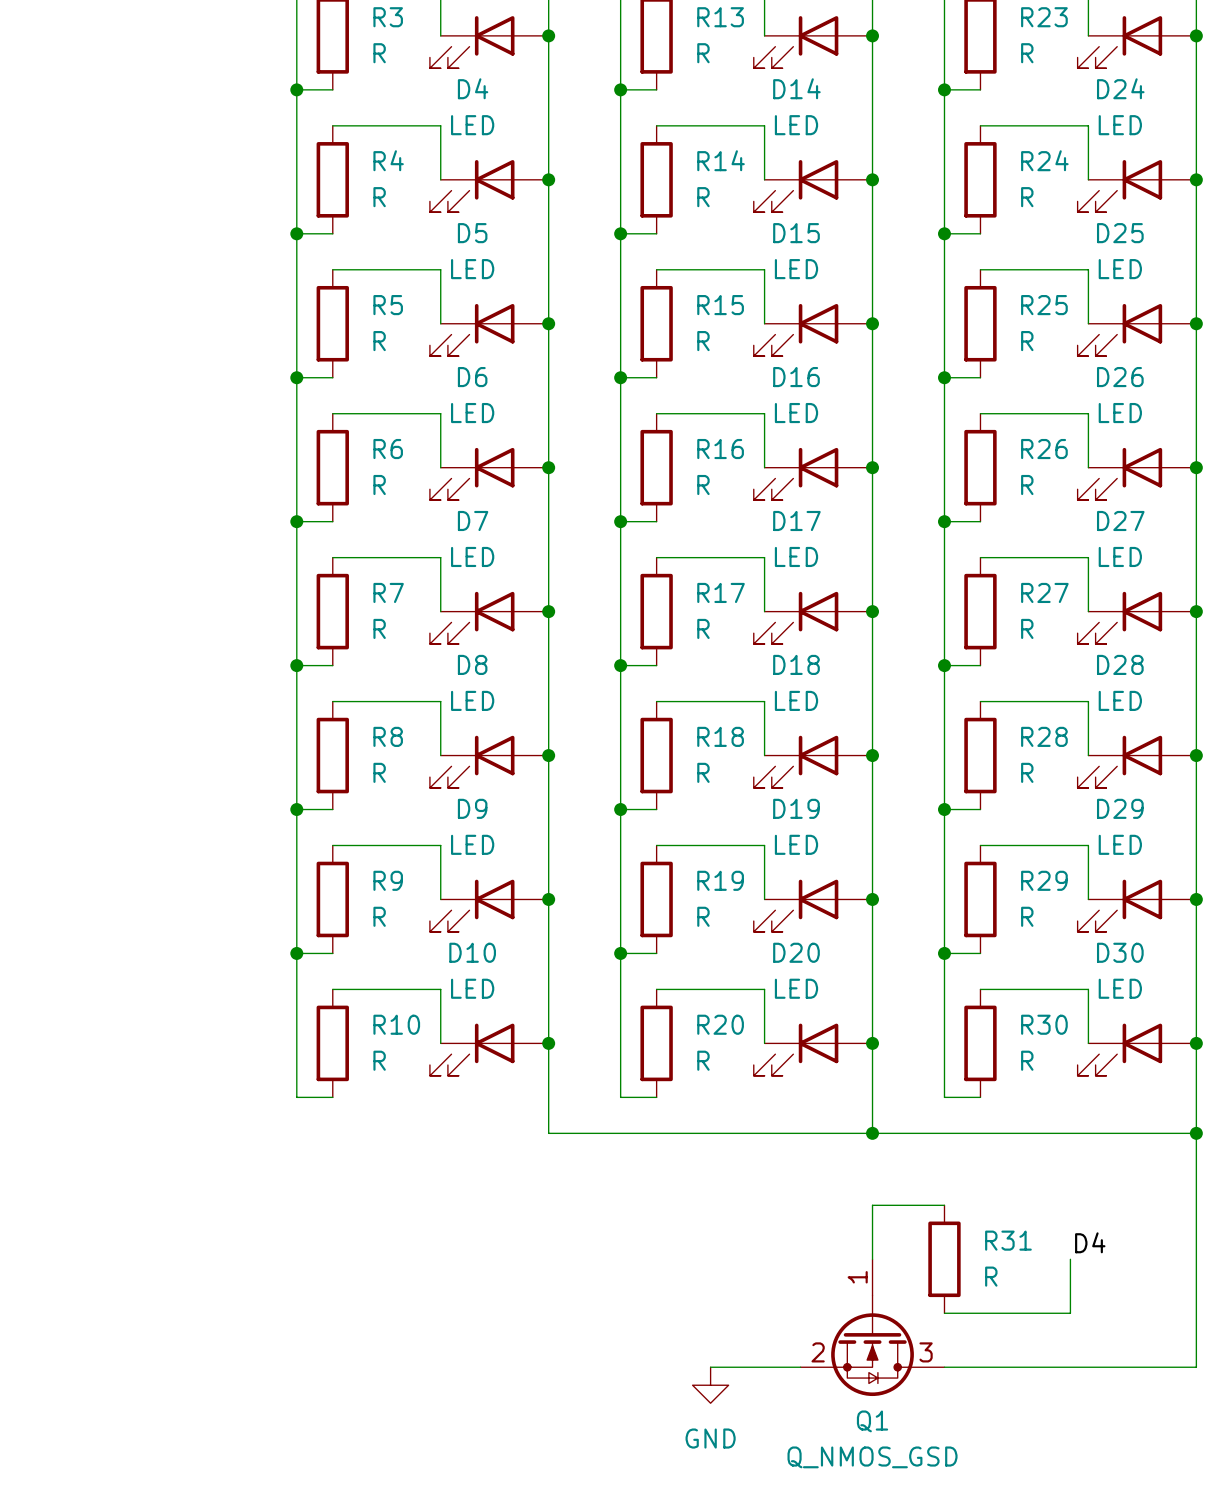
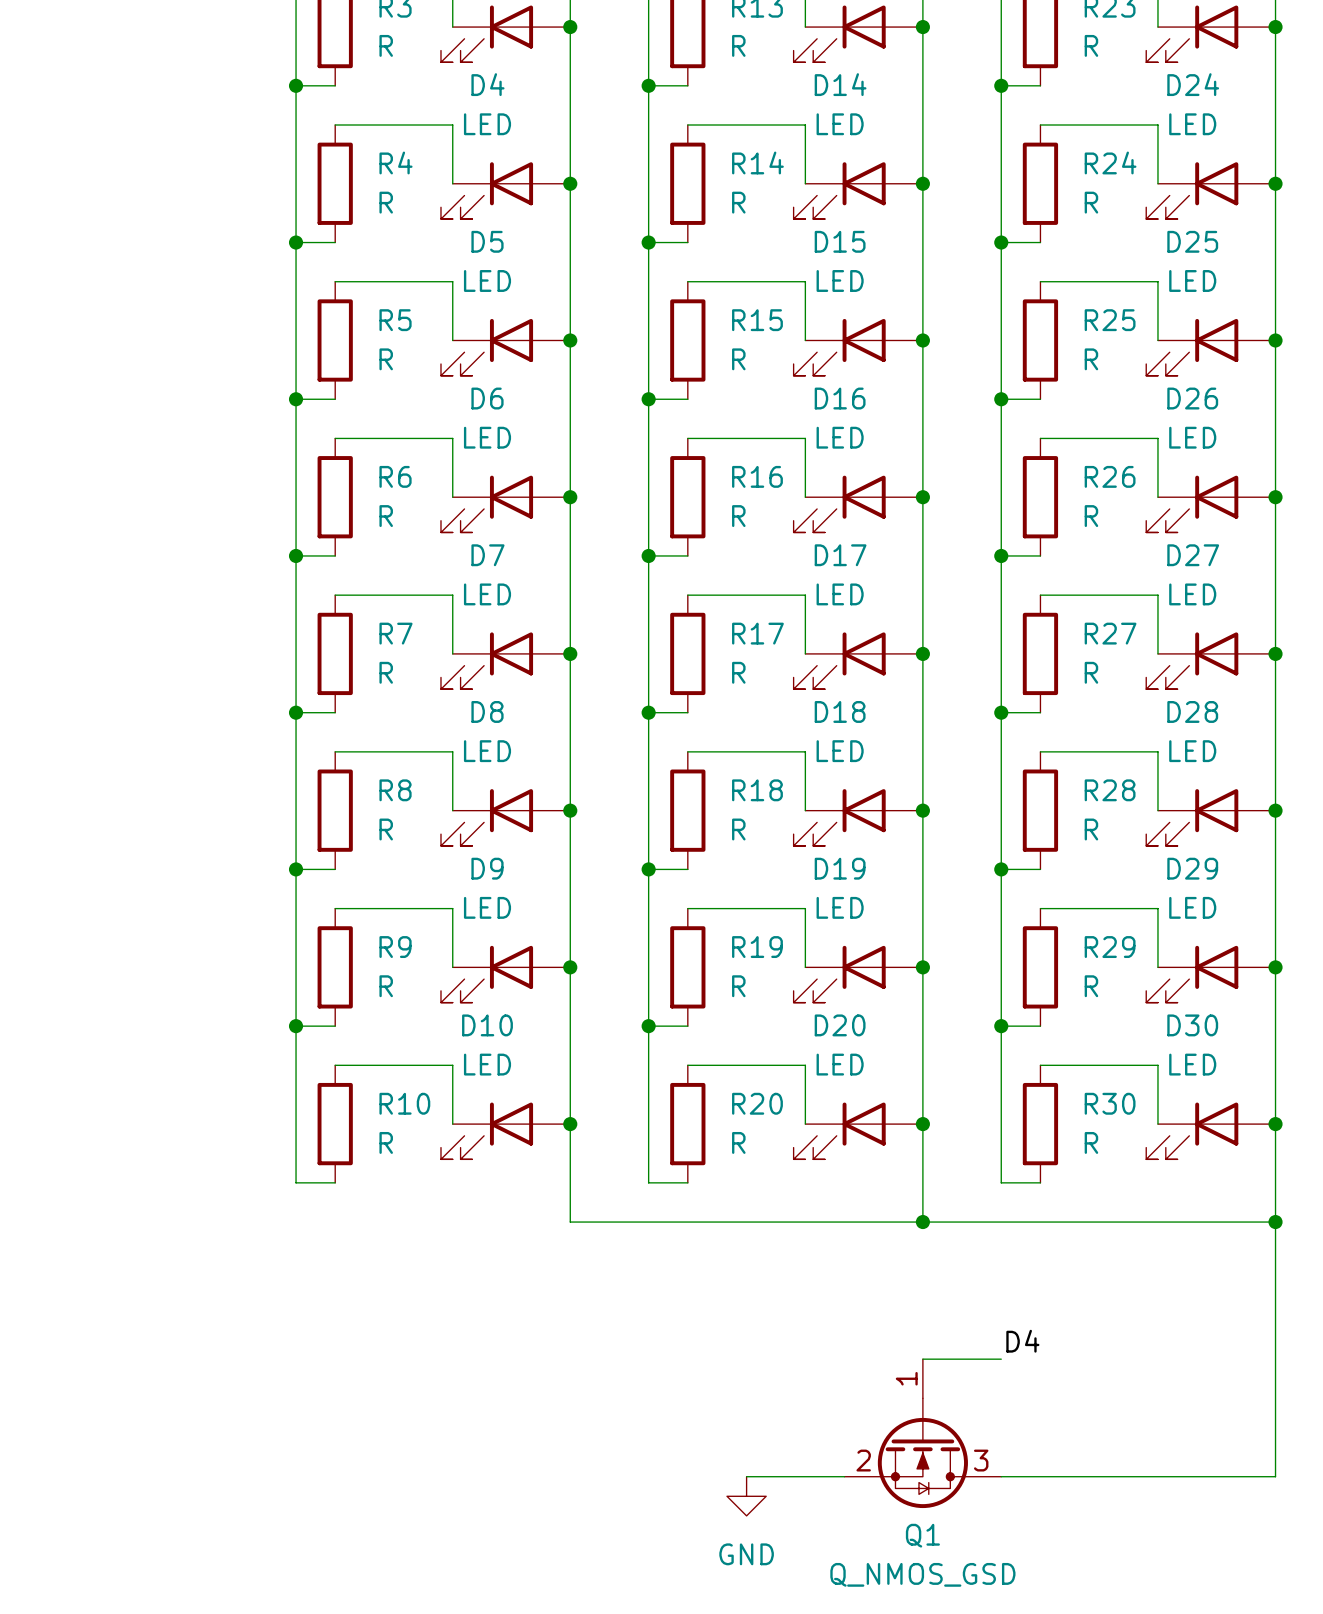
wire: (944, 1205) (872, 1205) (872, 1259) -> (1001, 1359) (922, 1359)
label position: D4 (1090, 1242) -> D4 (1022, 1341)
R31: R (944, 1259) -> none
wire: (1070, 1259) (1070, 1313) (944, 1313) -> none

